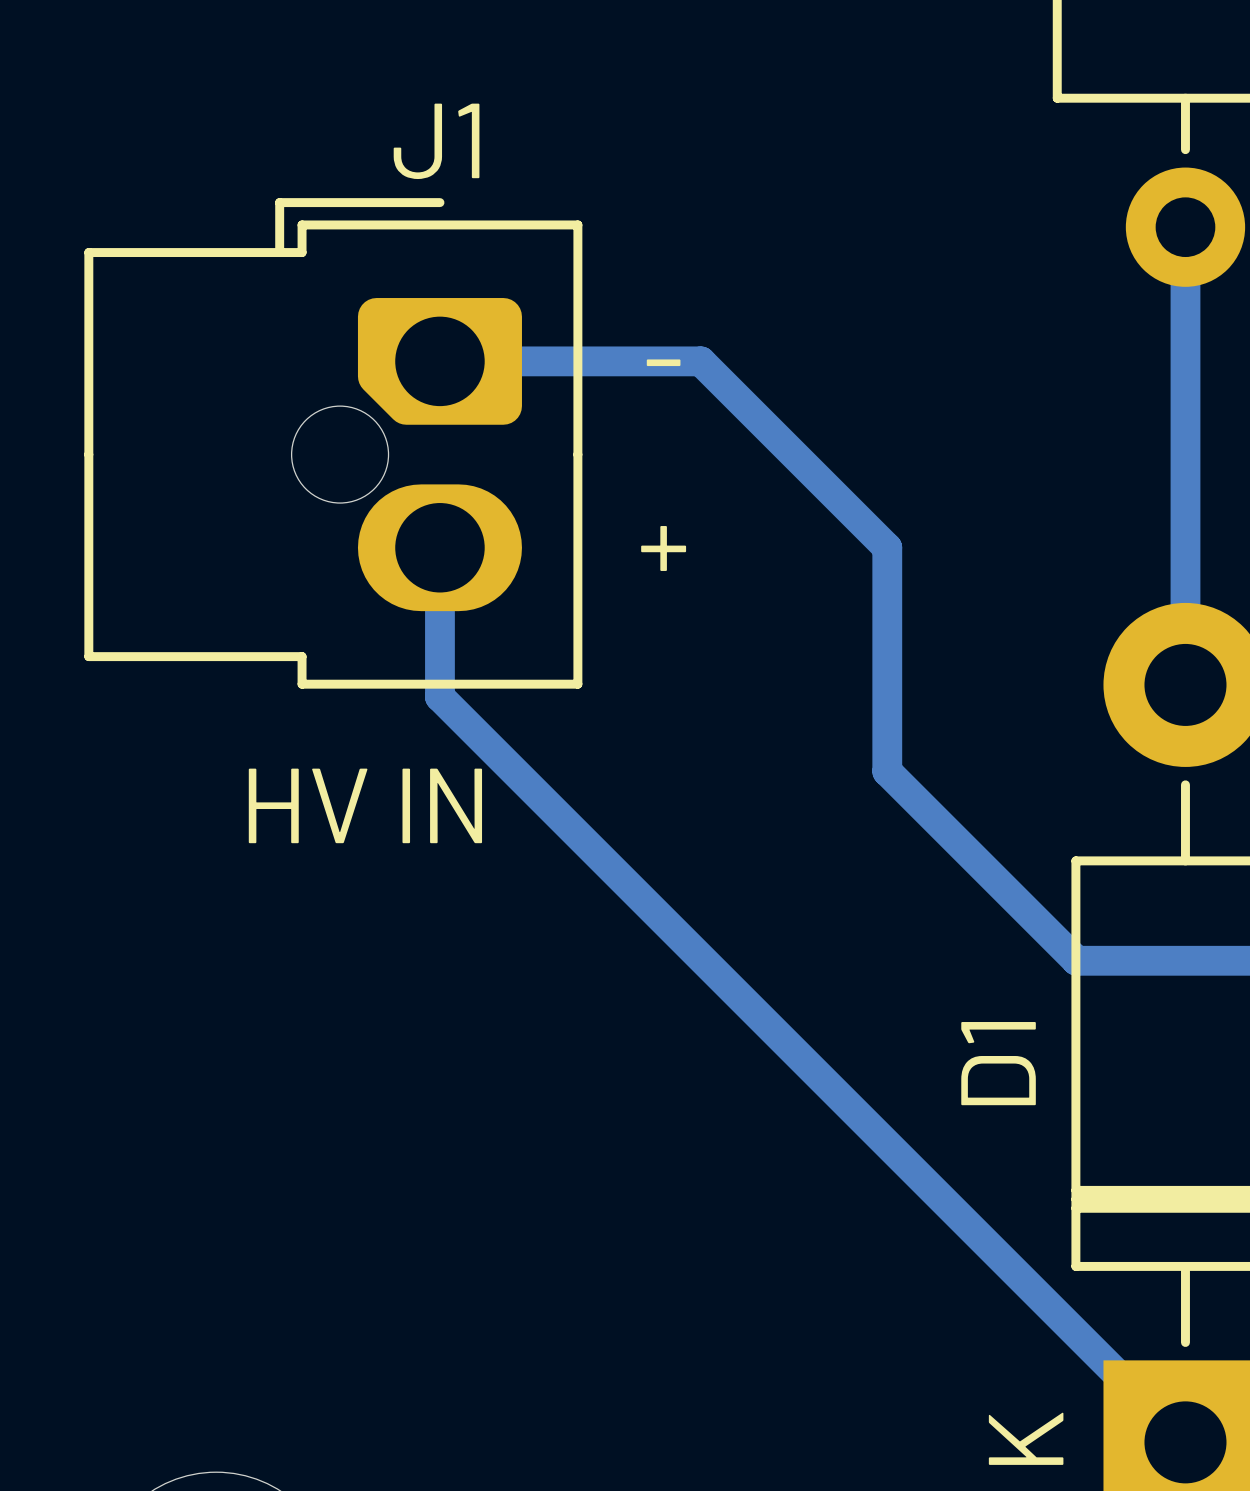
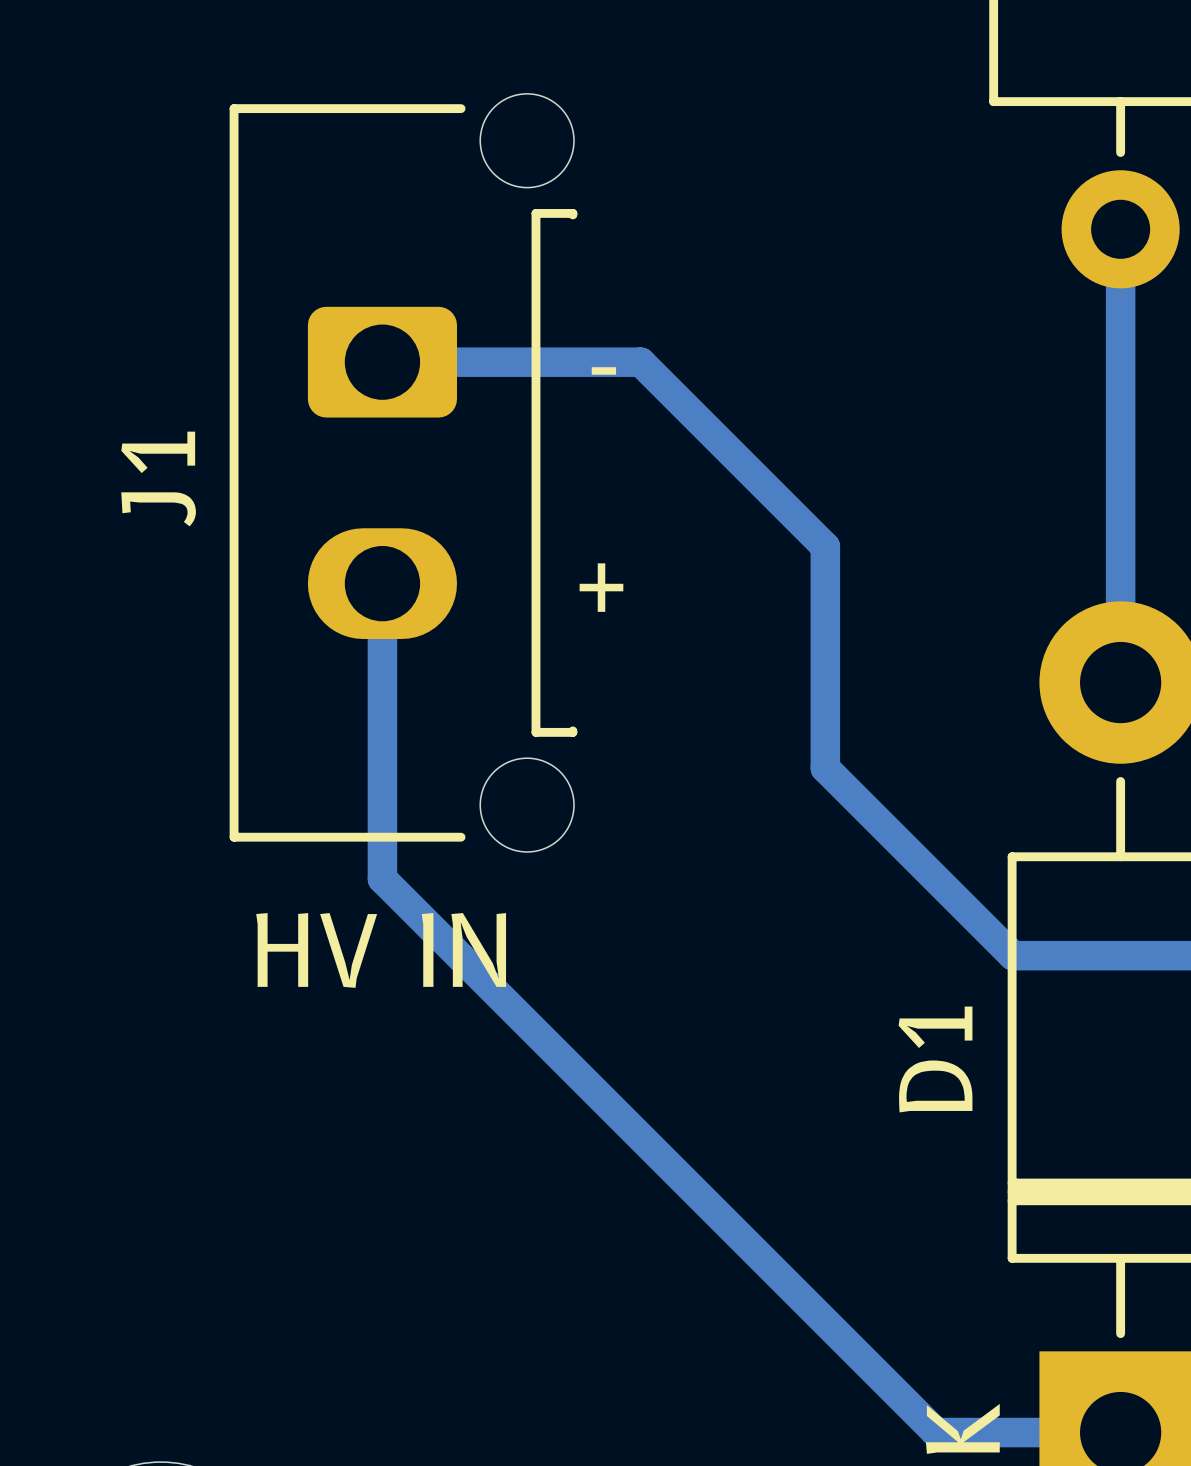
J1 name position: J1 (436, 141) -> J1 (158, 478)
J1 footprint: [84, 198, 583, 689] -> [229, 93, 578, 852]
text position: + (663, 548) -> + (601, 587)
bottom track: (439, 696) (1185, 1442) -> (382, 694) (382, 878) (936, 1432) (1120, 1432)
text position: HV IN (365, 805) -> HV IN (381, 950)

